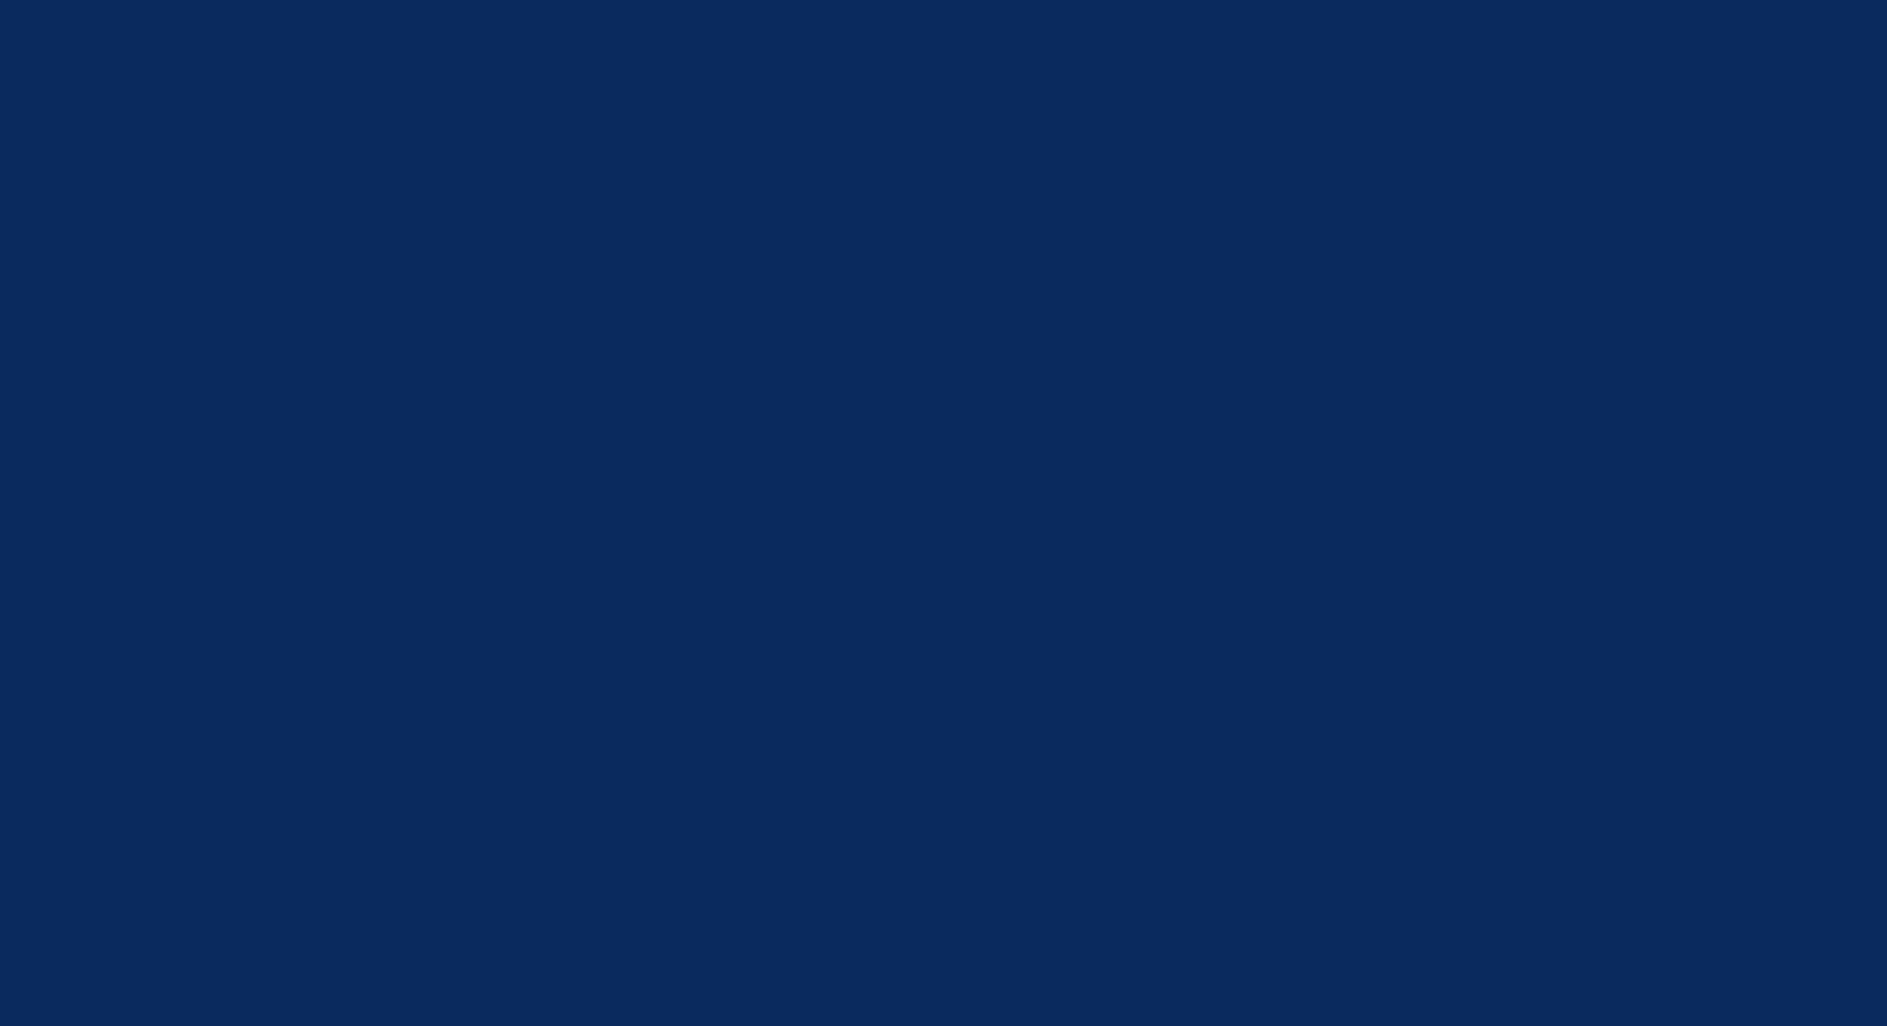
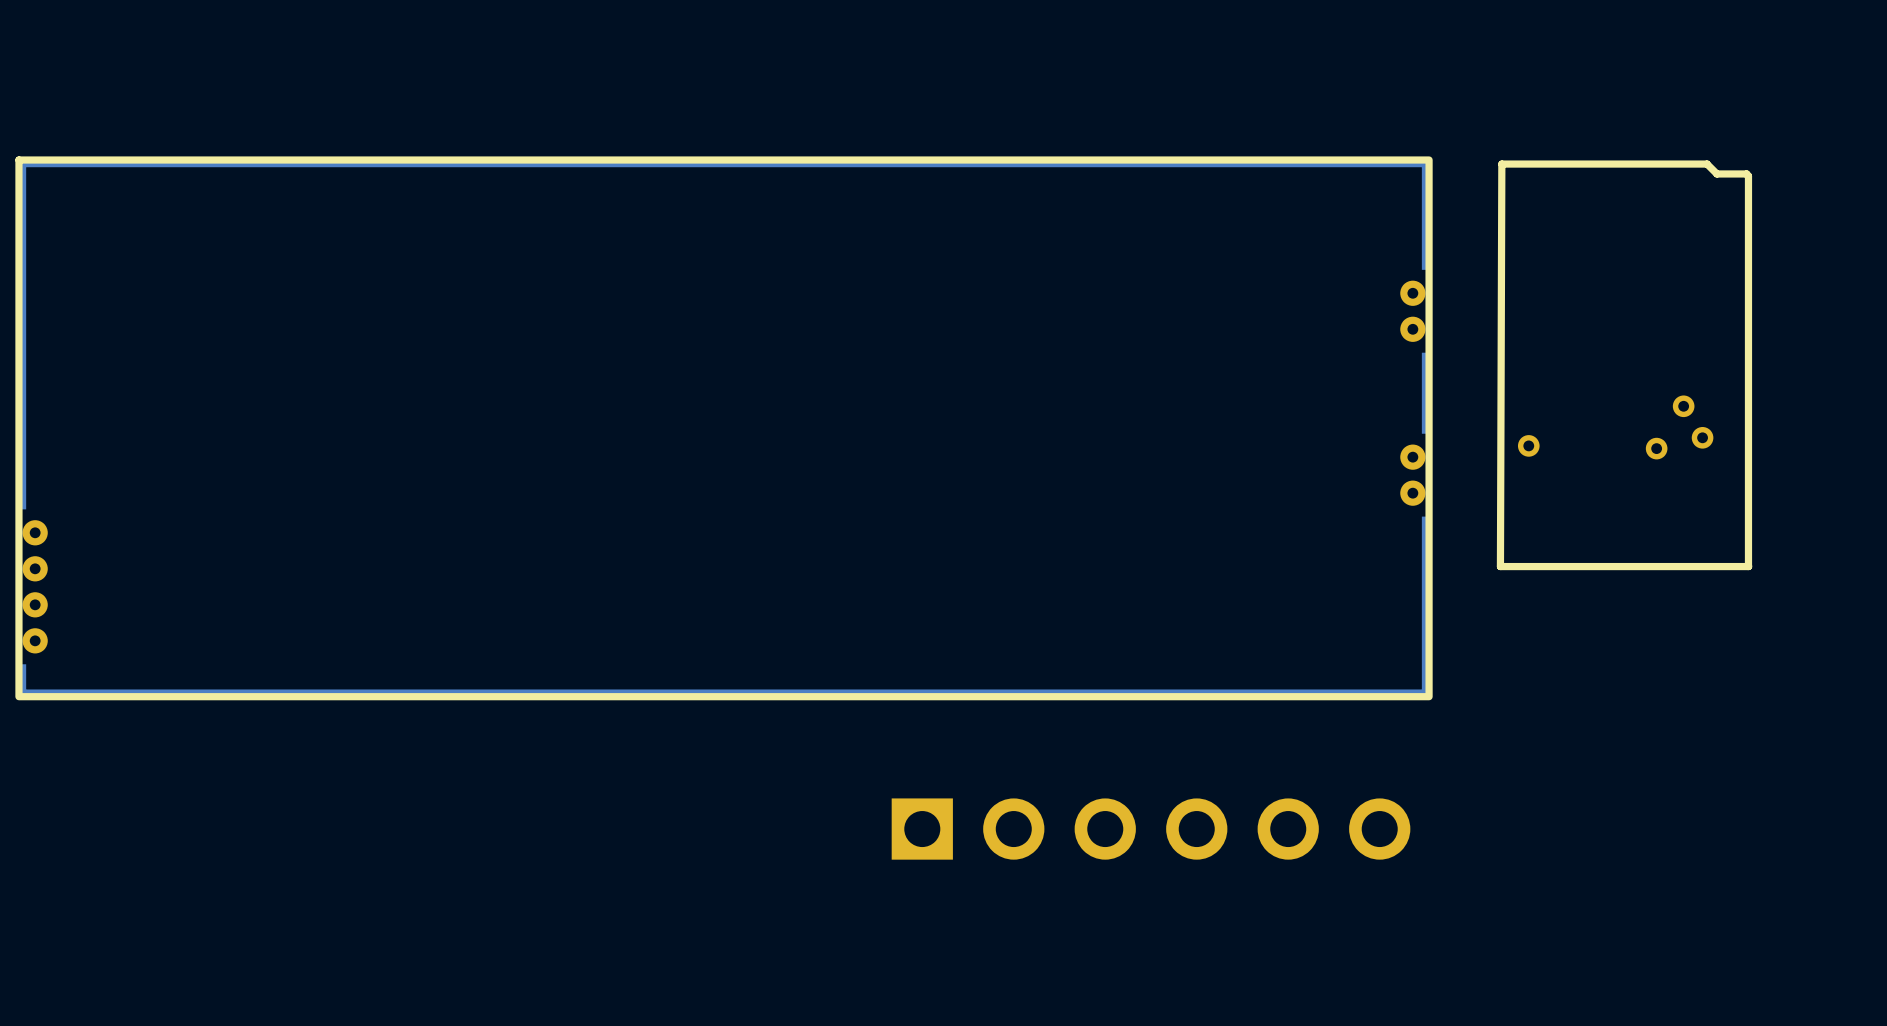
part: none -> (1624, 365)
part: none -> (724, 428)
part: none -> (1151, 829)

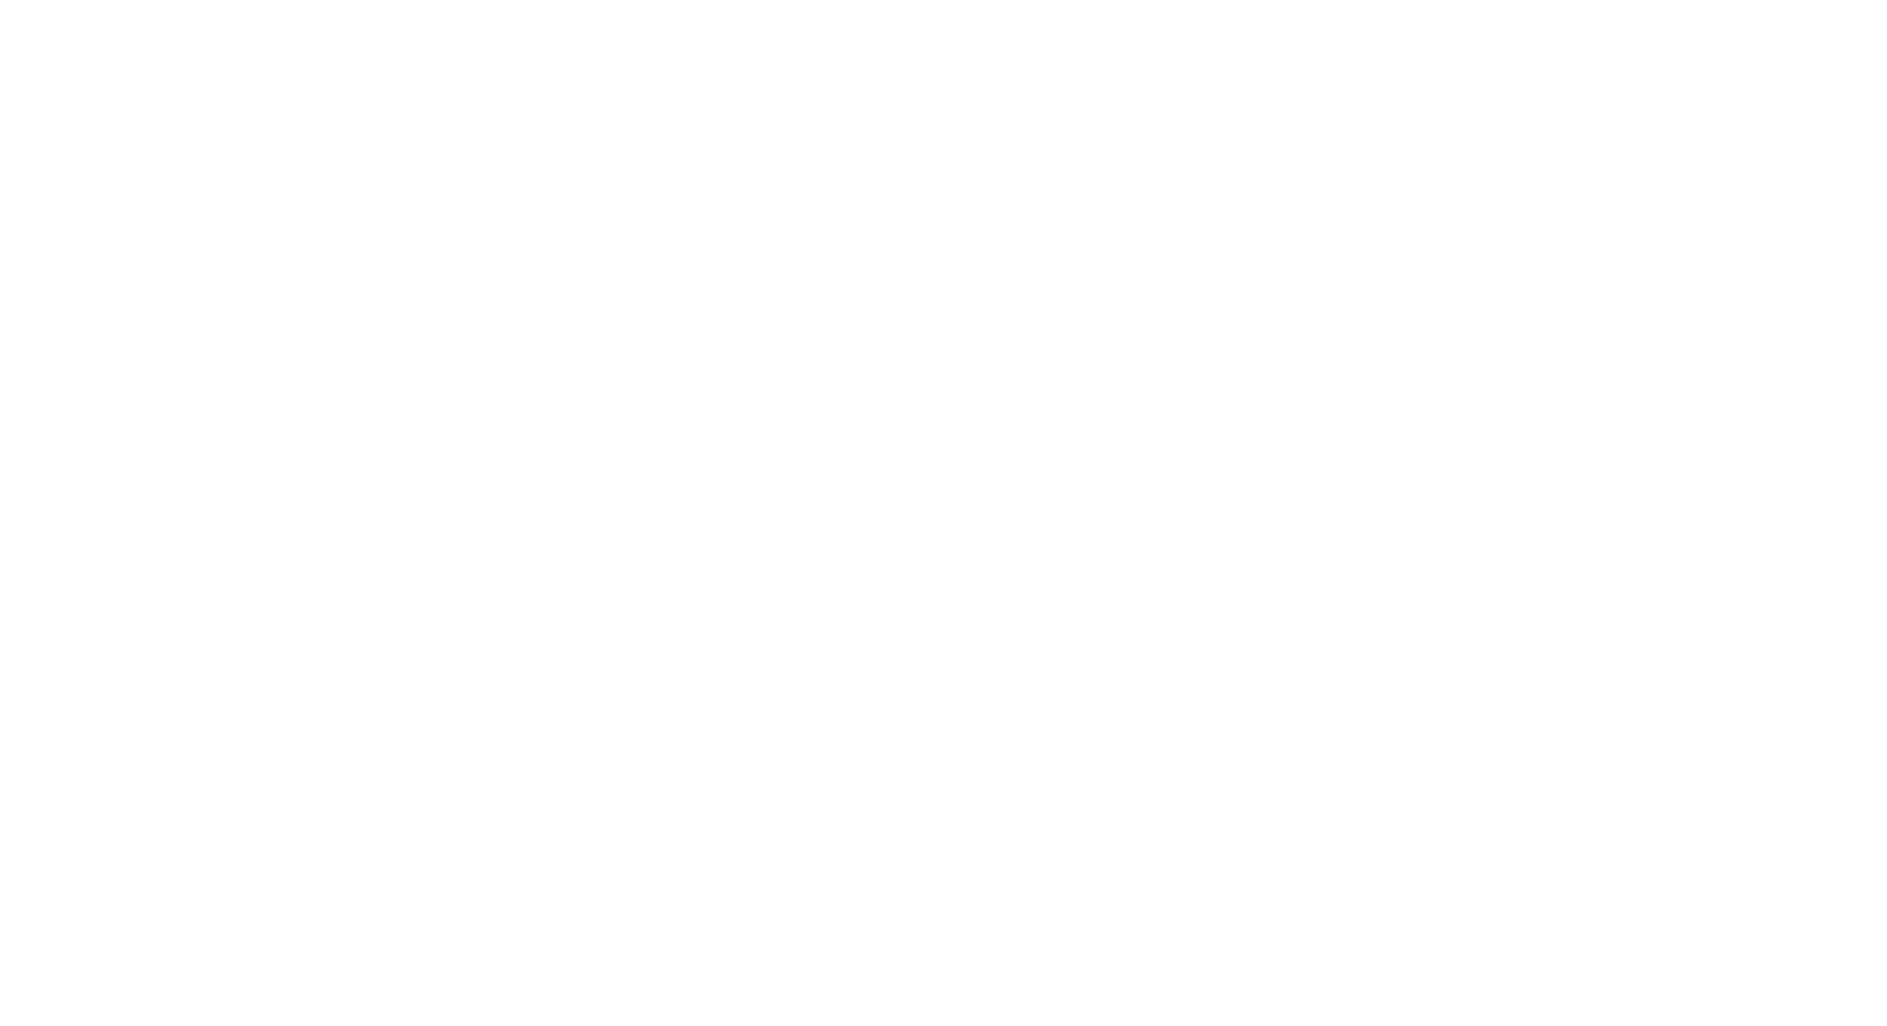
part: (1624, 365) -> none
part: (724, 428) -> none
part: (1151, 829) -> none

